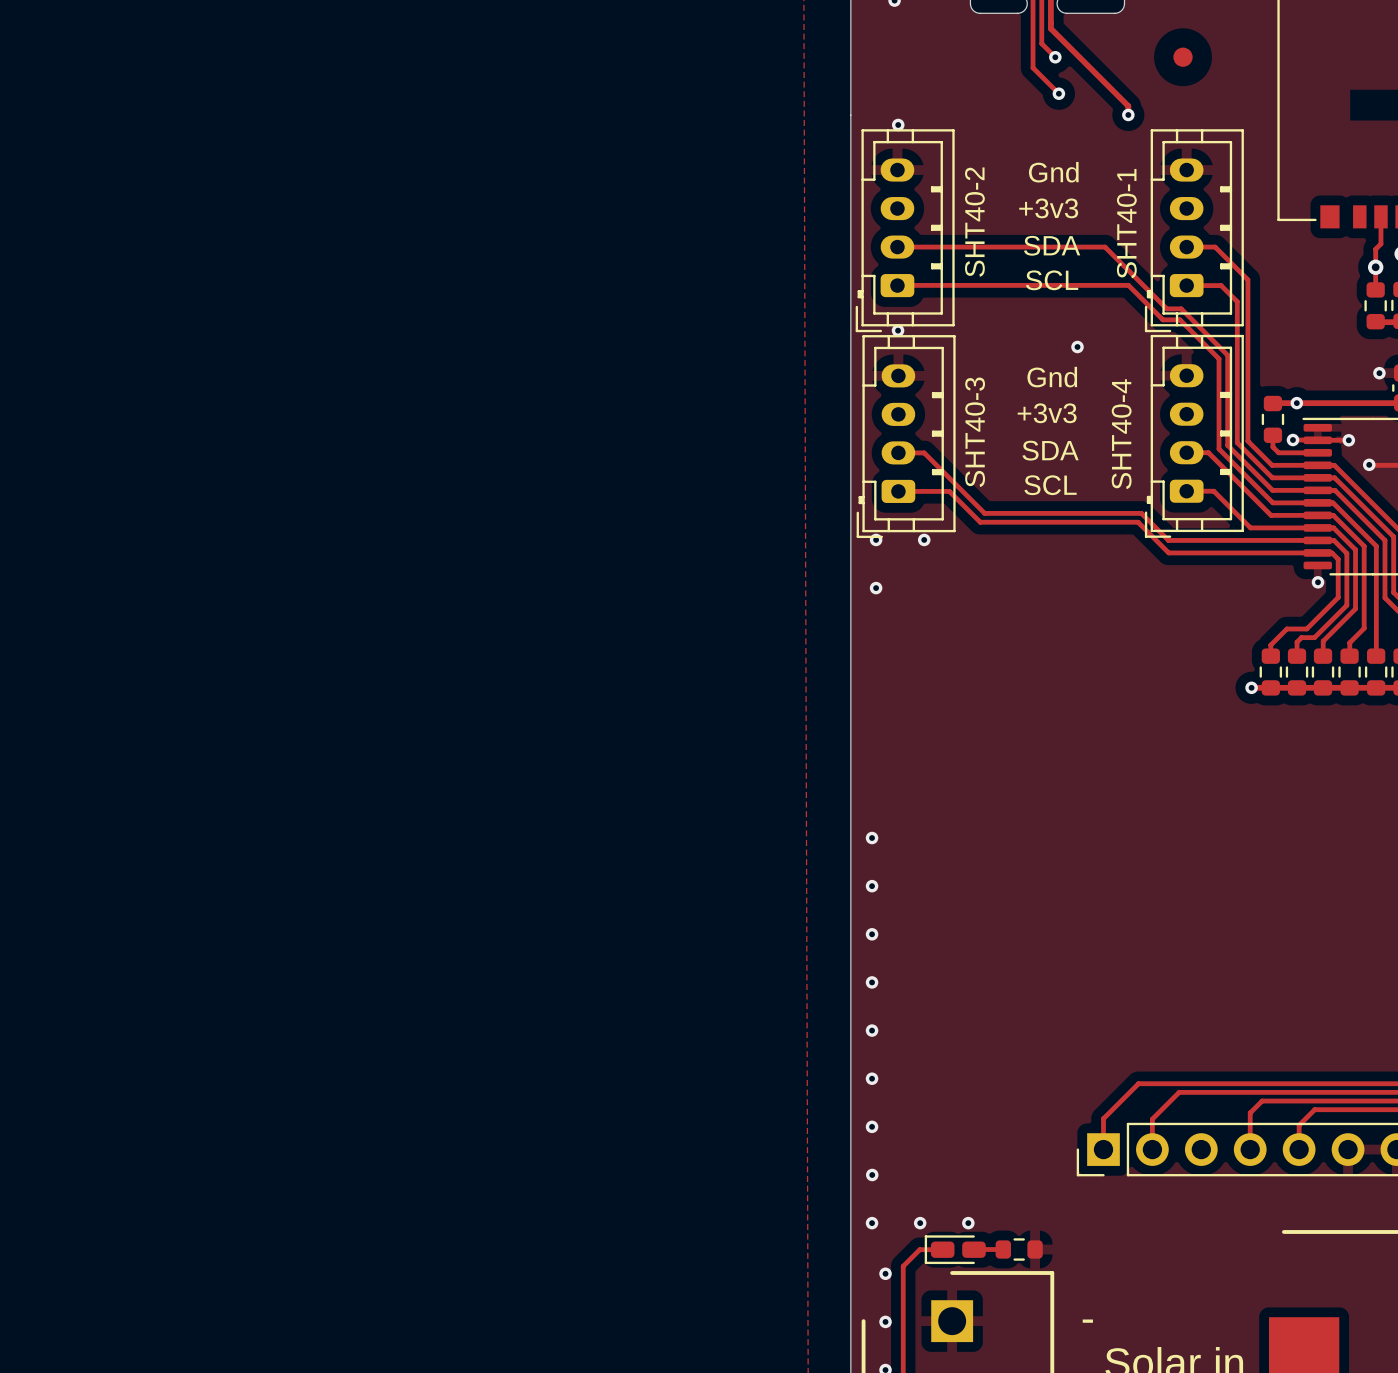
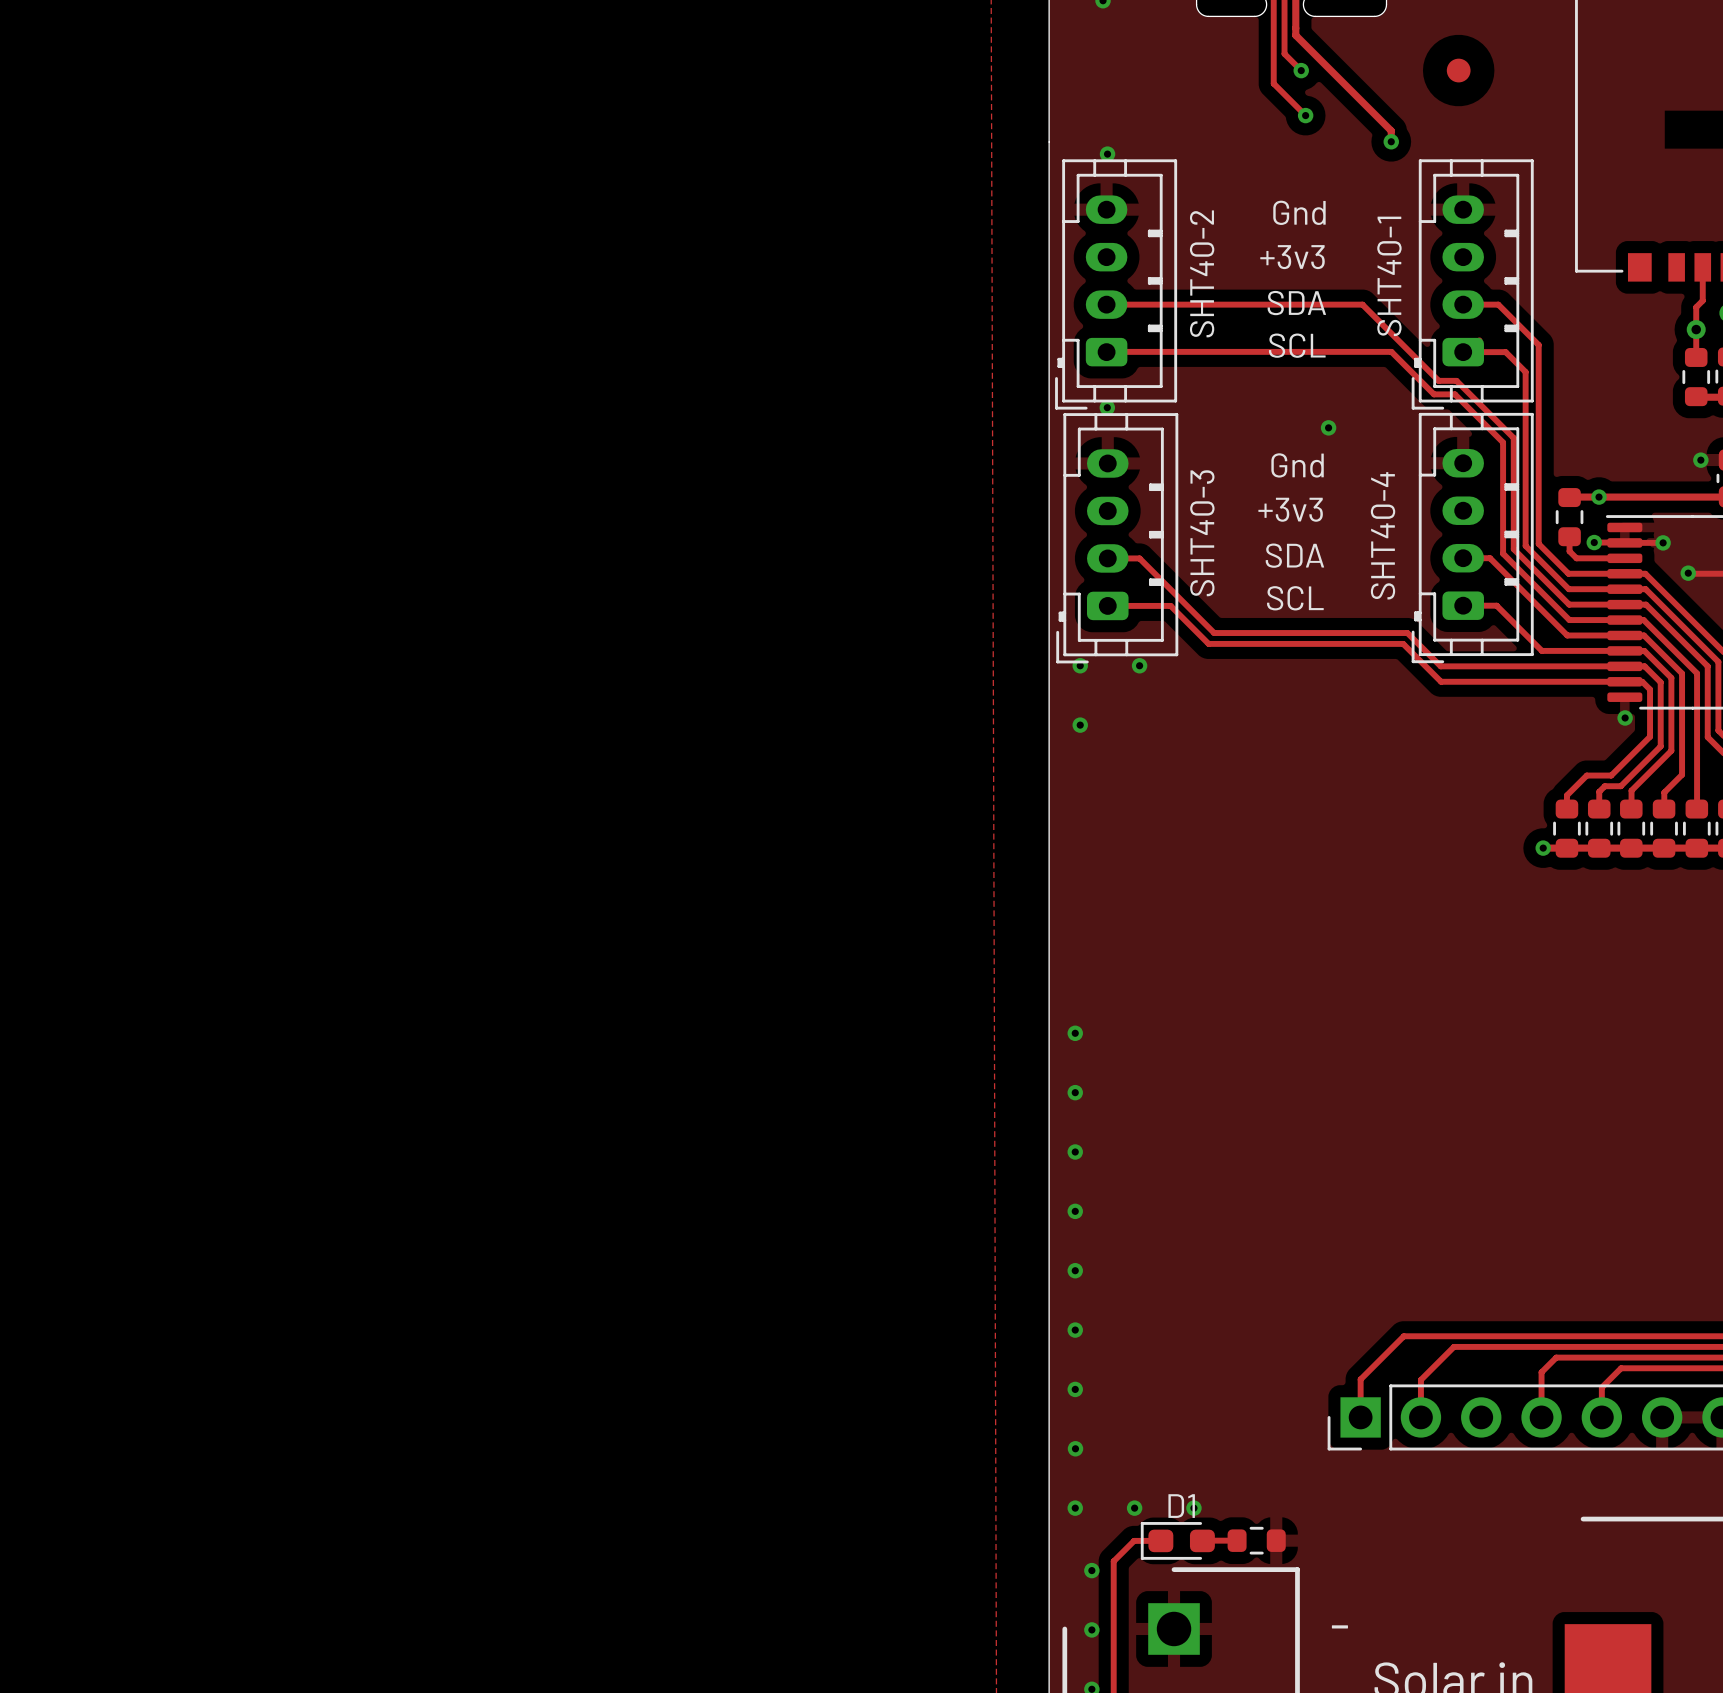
part: (955, 1249) -> none
D1: none -> (1177, 1540)

